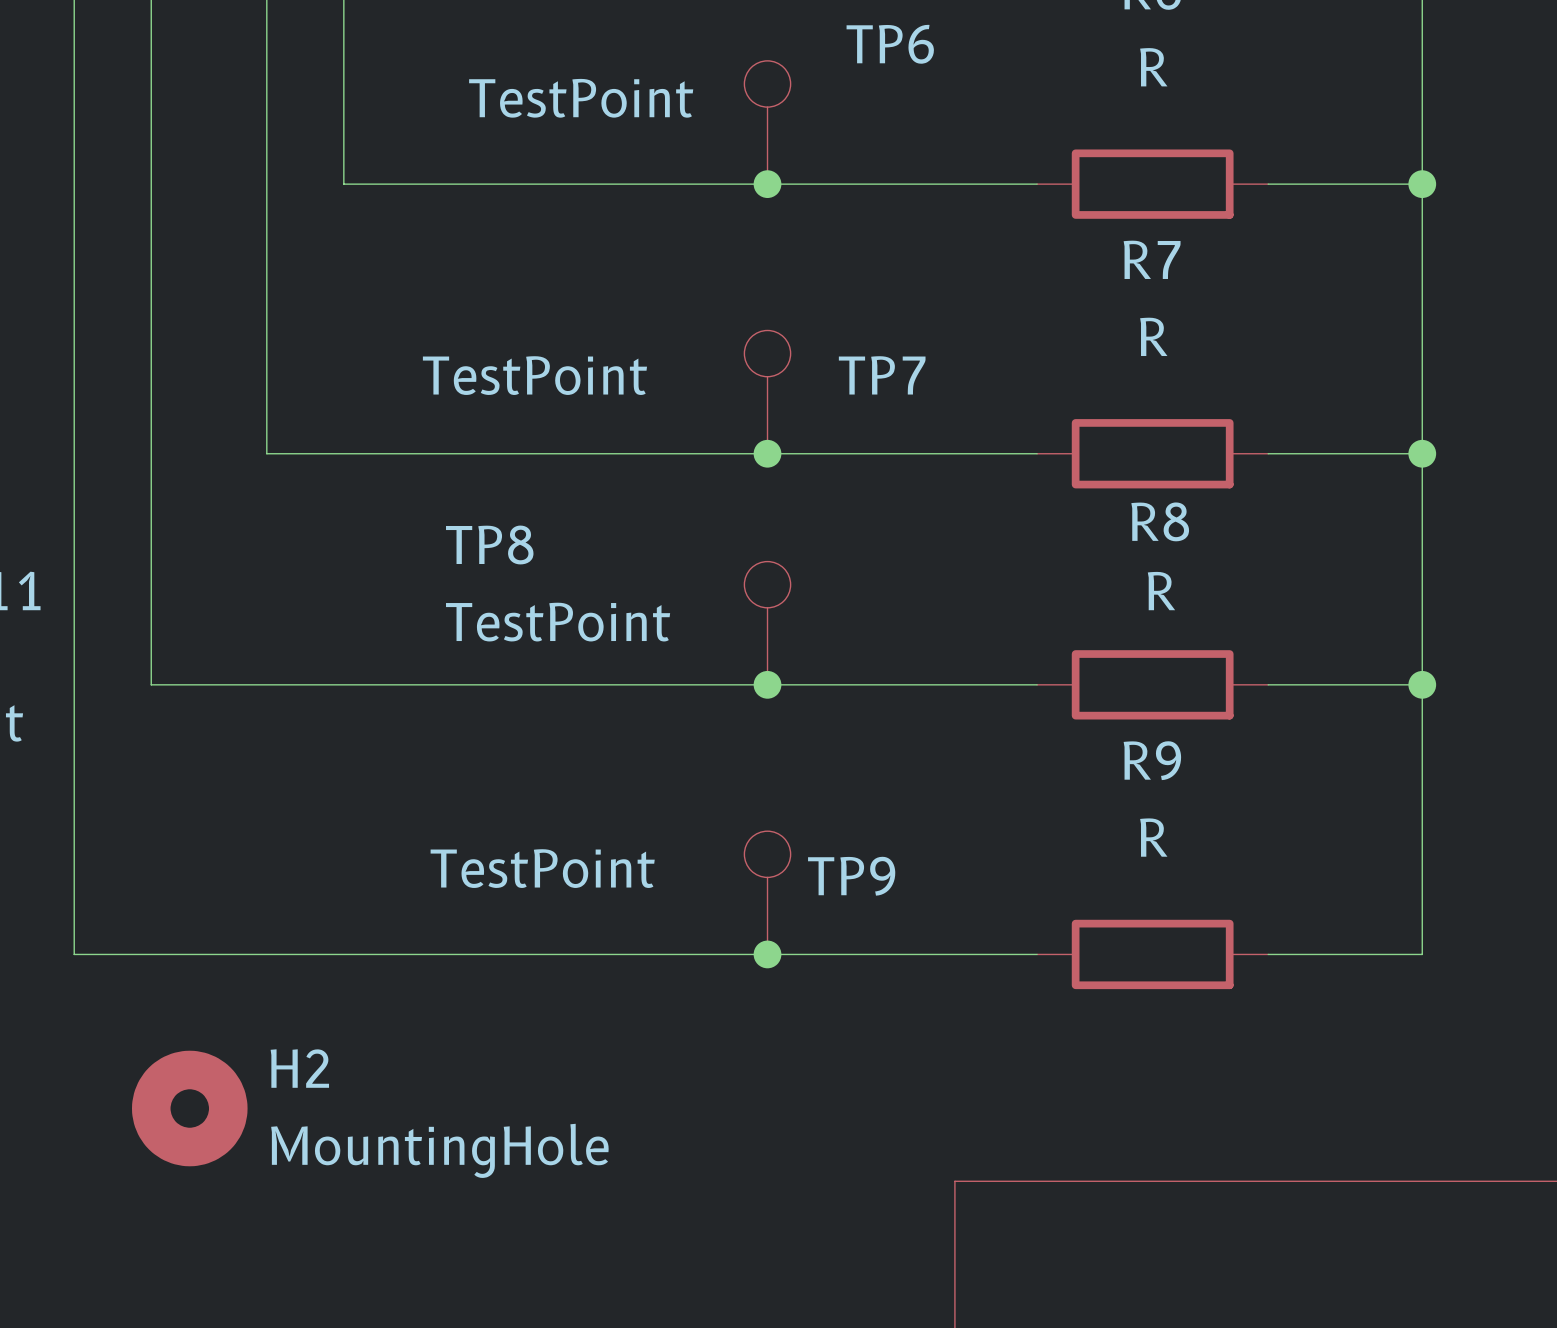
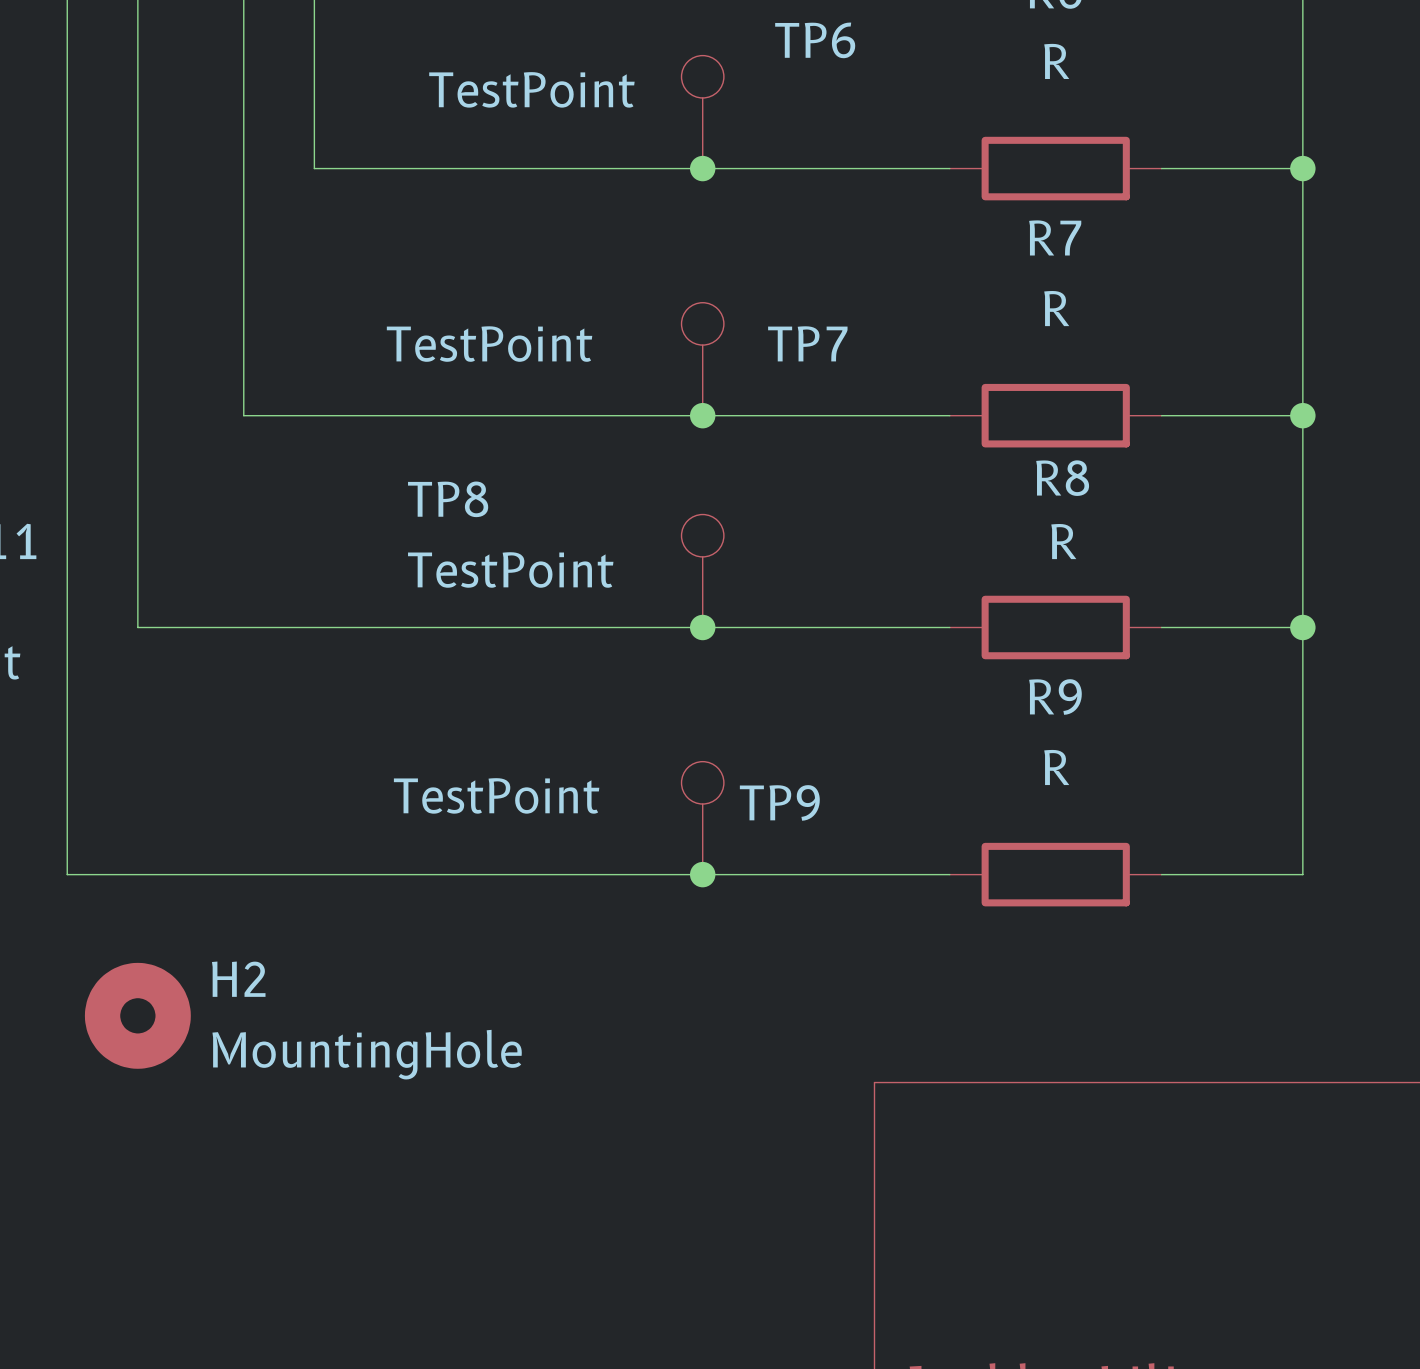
H2 position: (189, 1108) -> (137, 1015)

